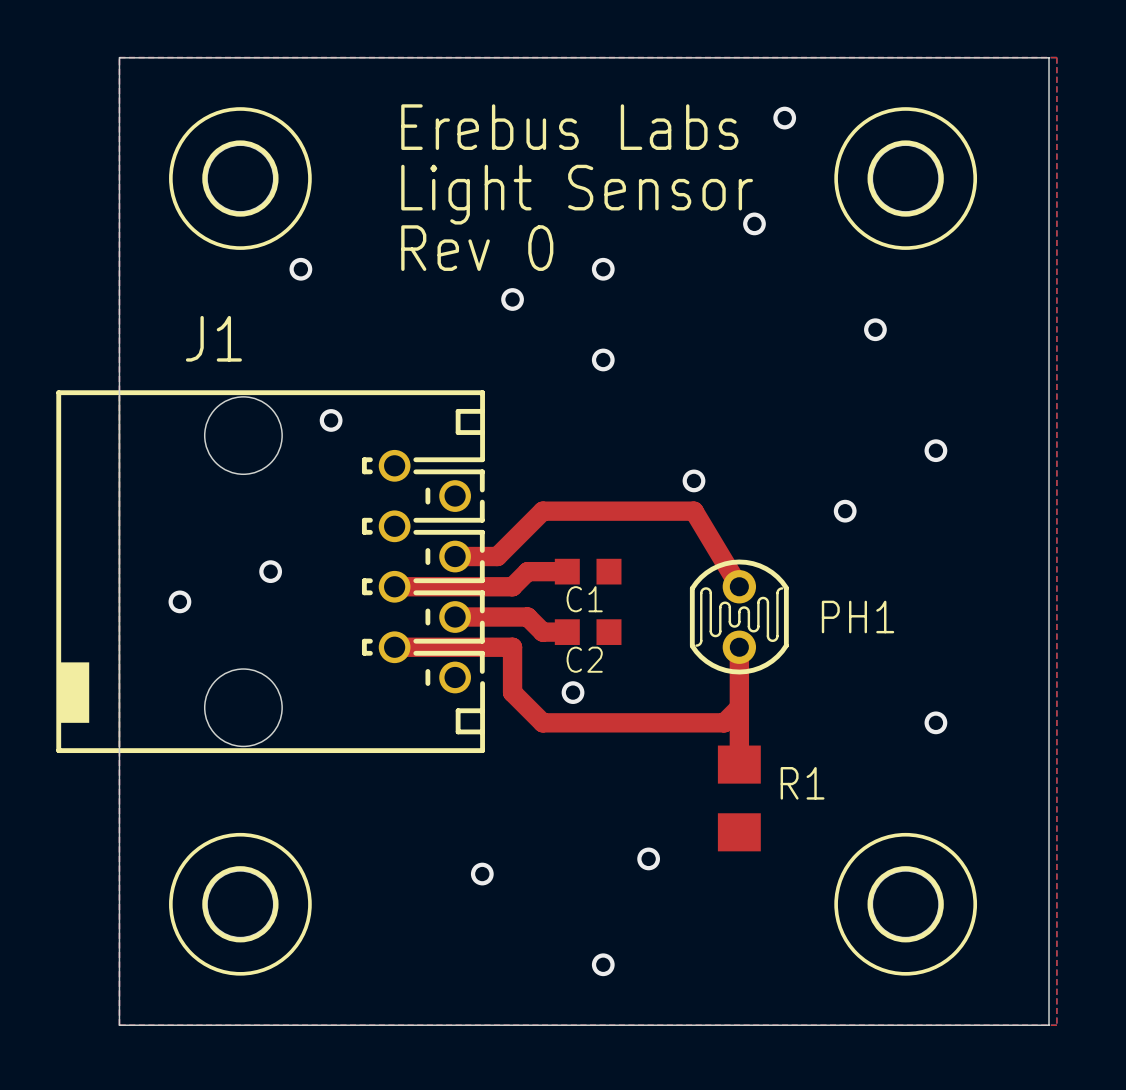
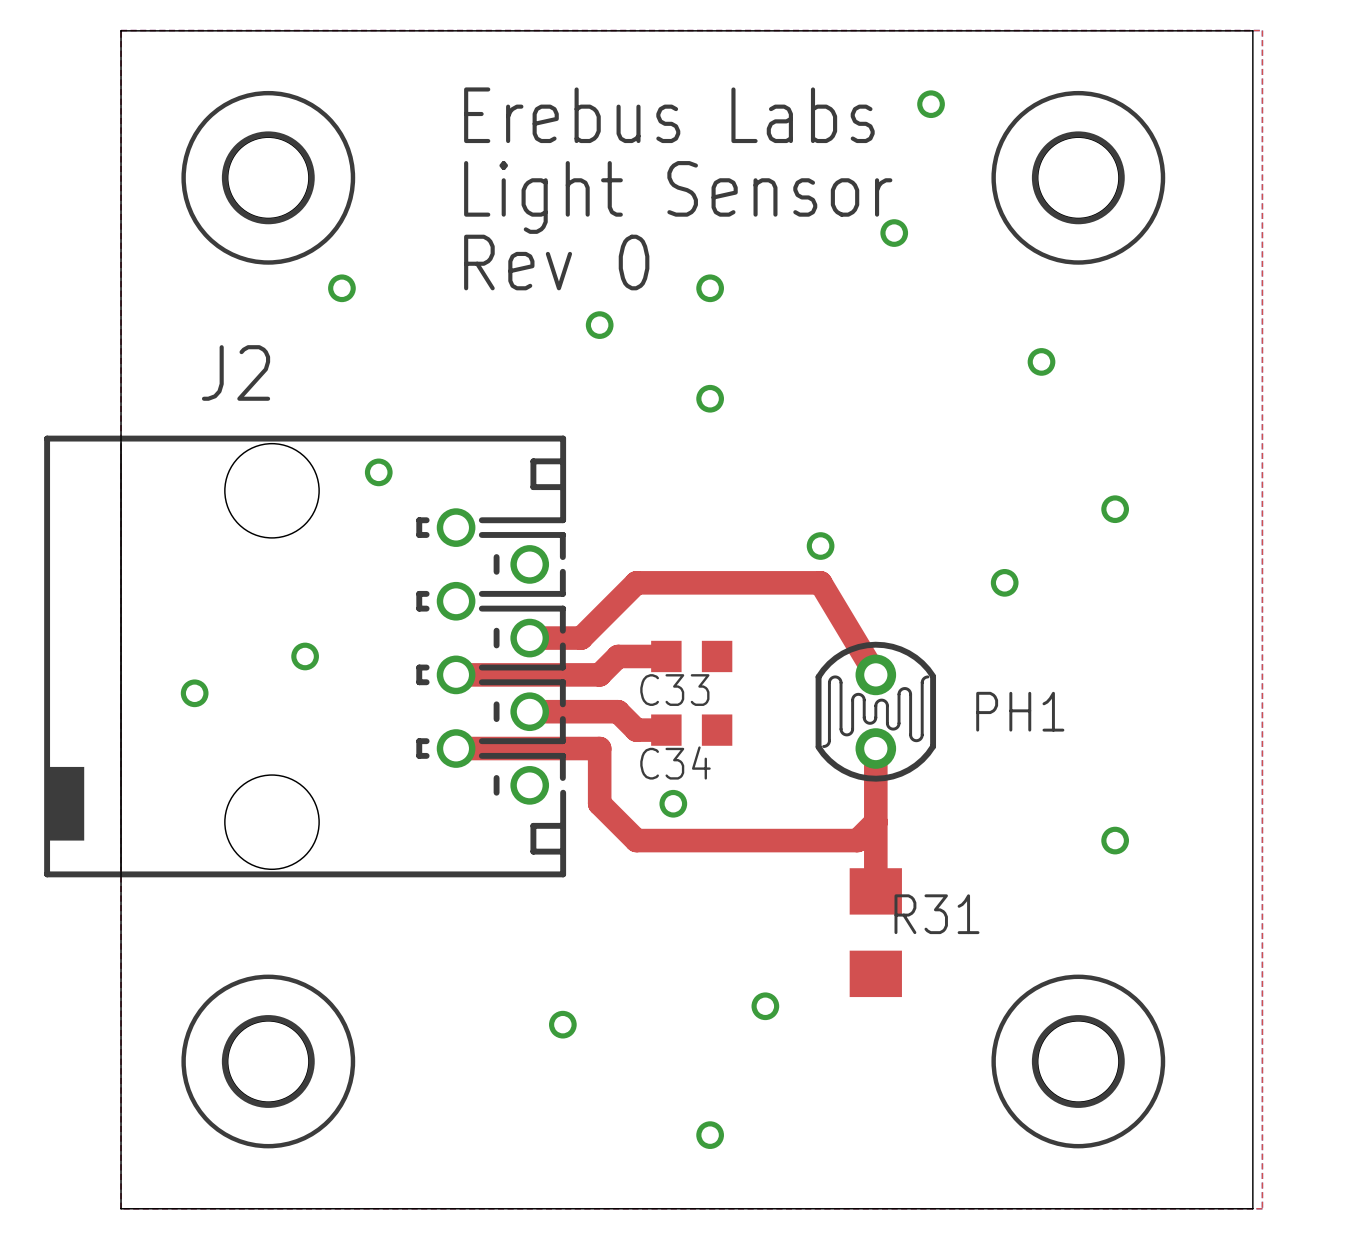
J1 name: J1 (213, 338) -> J2 (236, 372)
C1 name: C1 (584, 599) -> C33 (674, 690)
C2 name: C2 (584, 659) -> C34 (675, 762)
R1 name: R1 (802, 783) -> R31 (937, 914)

